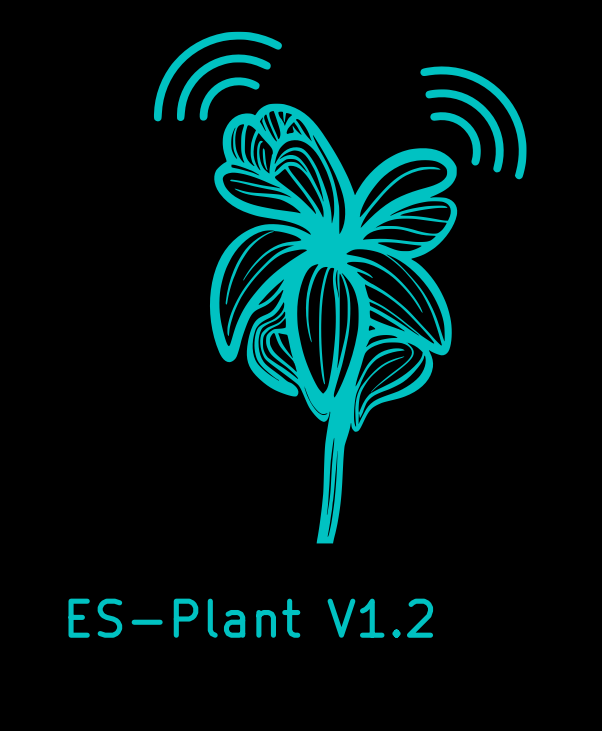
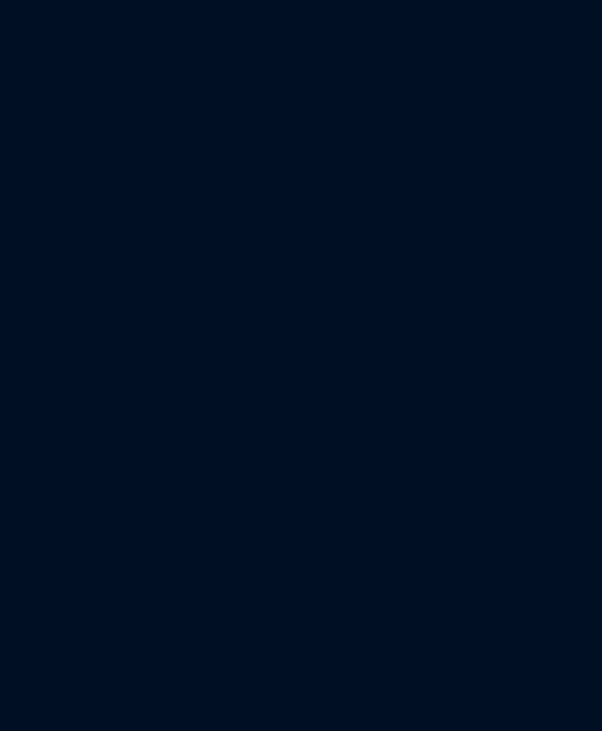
drawing: [153, 31, 527, 544] -> none
text: ES-Plant V1.2 (250, 618) -> none

